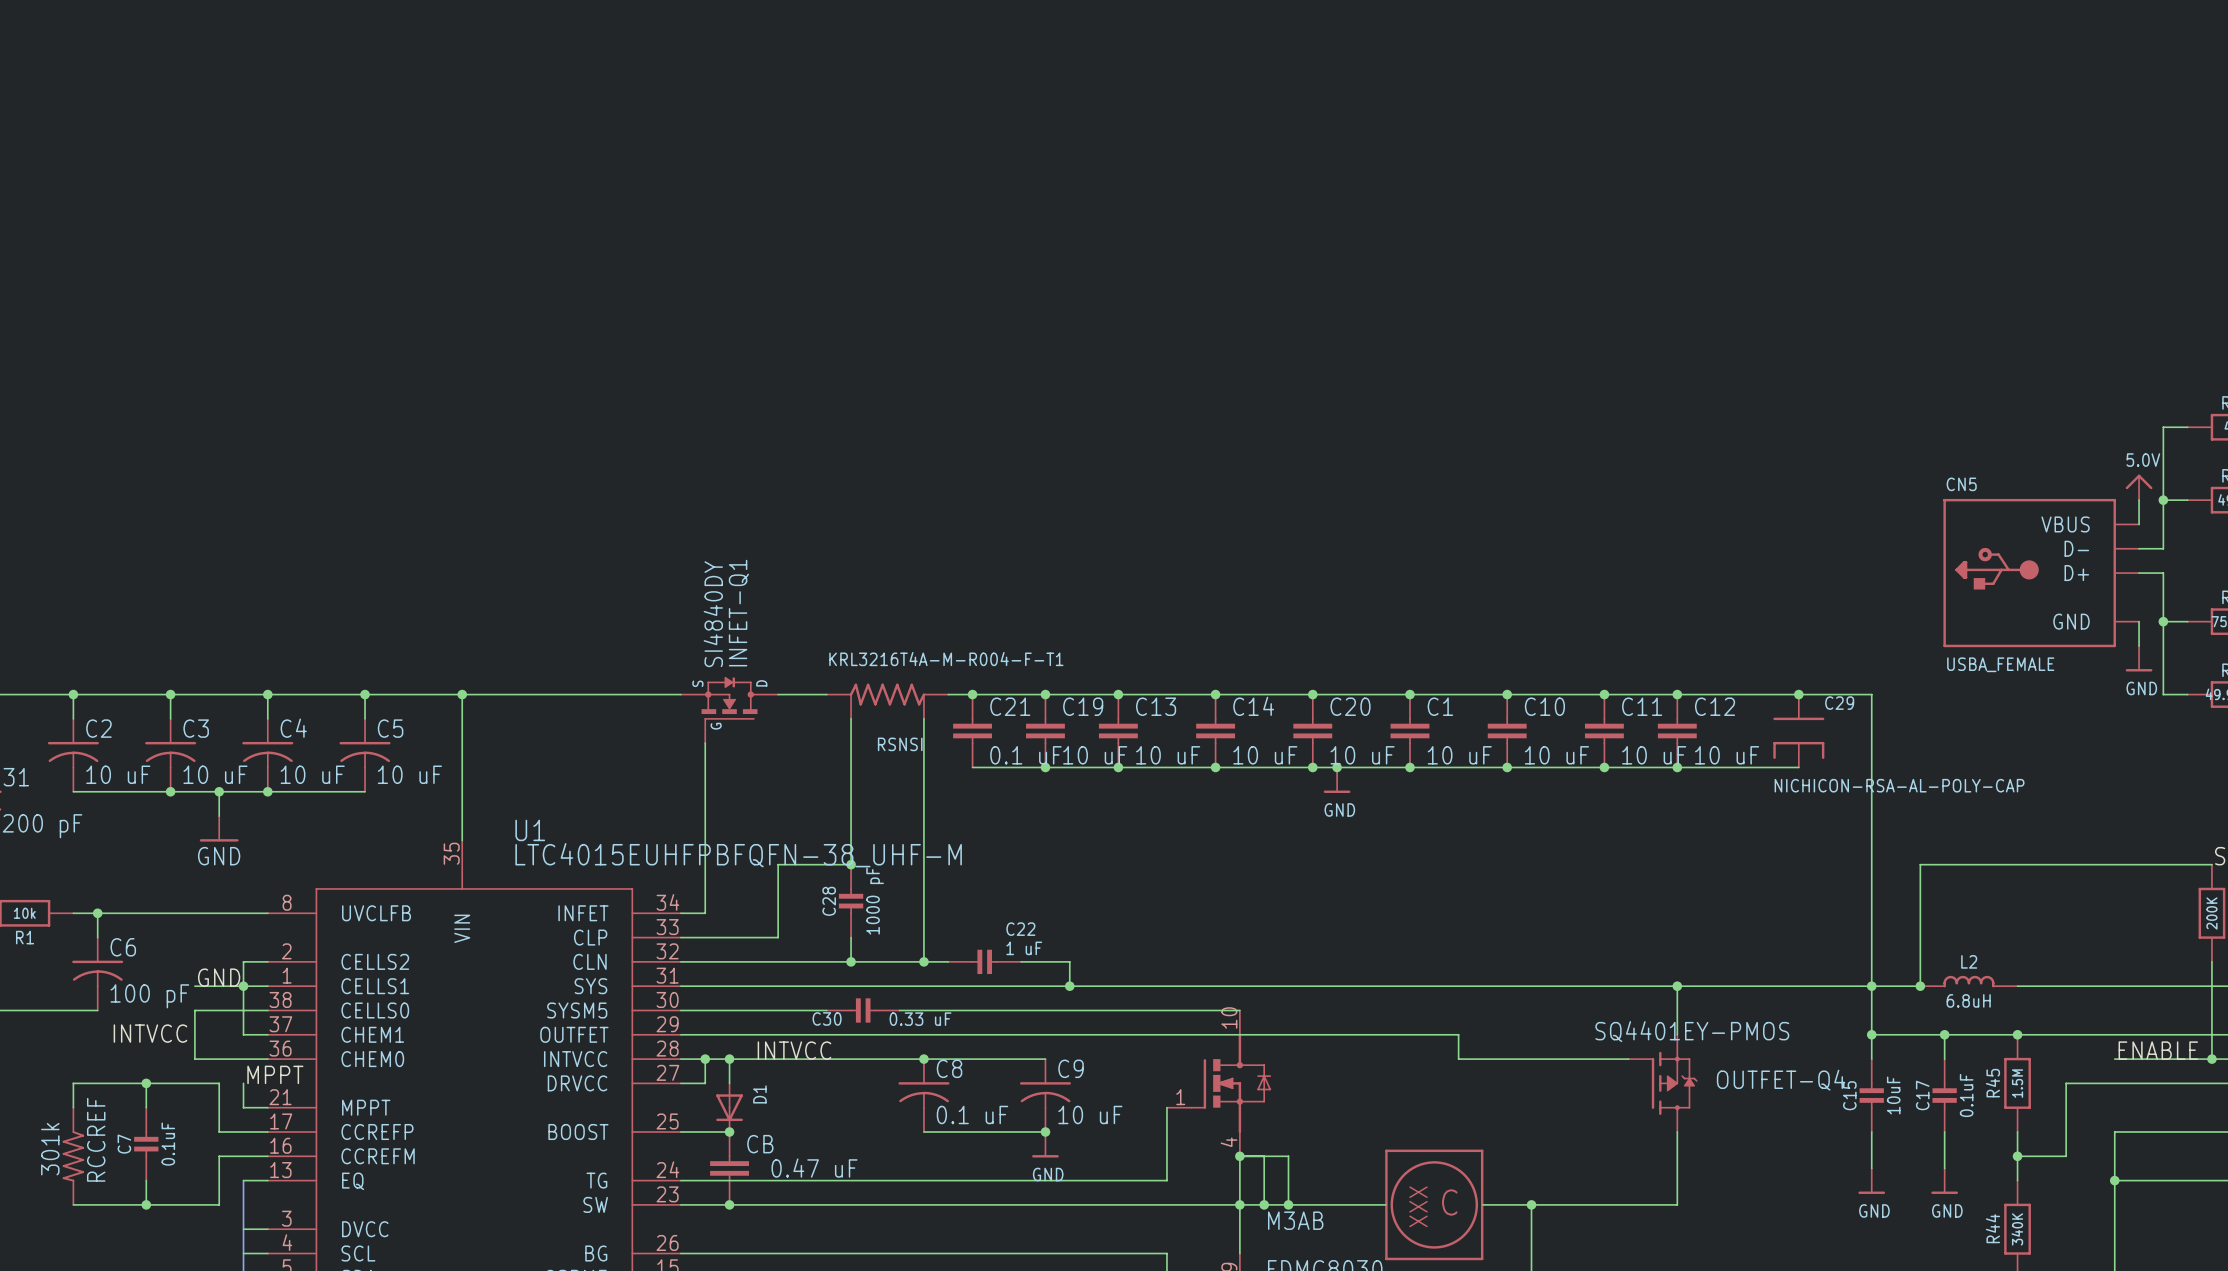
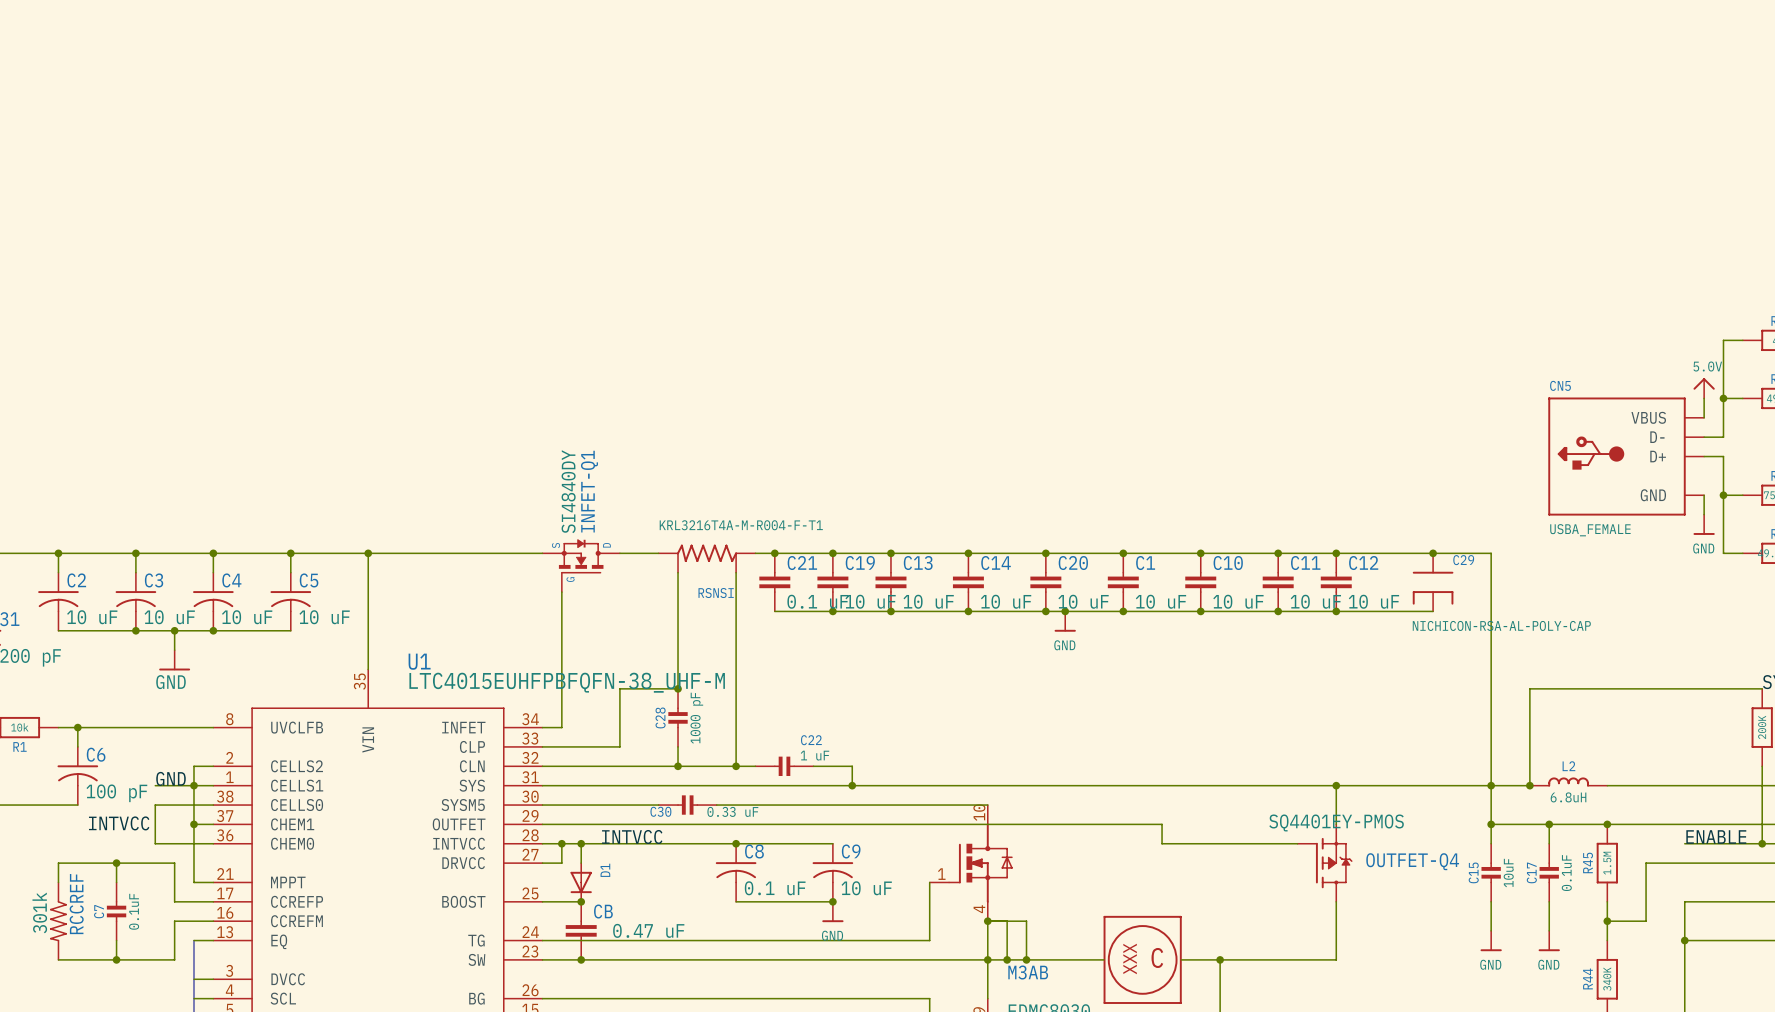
wire: none -> (193, 824) (193, 863)
junction: none -> (193, 824)
label: MPPT (275, 1074) -> none

